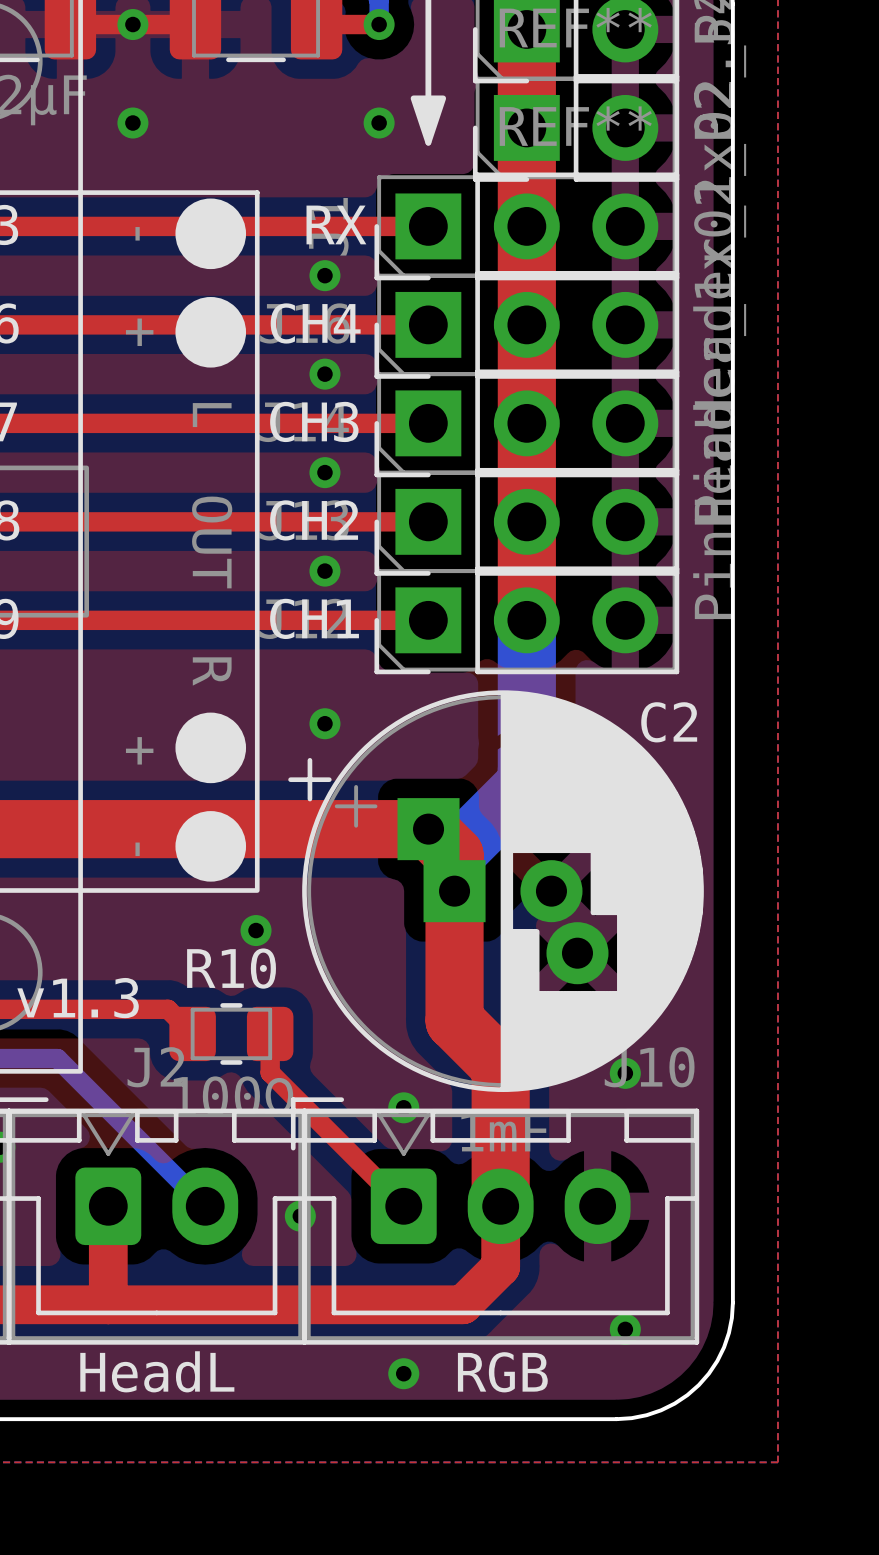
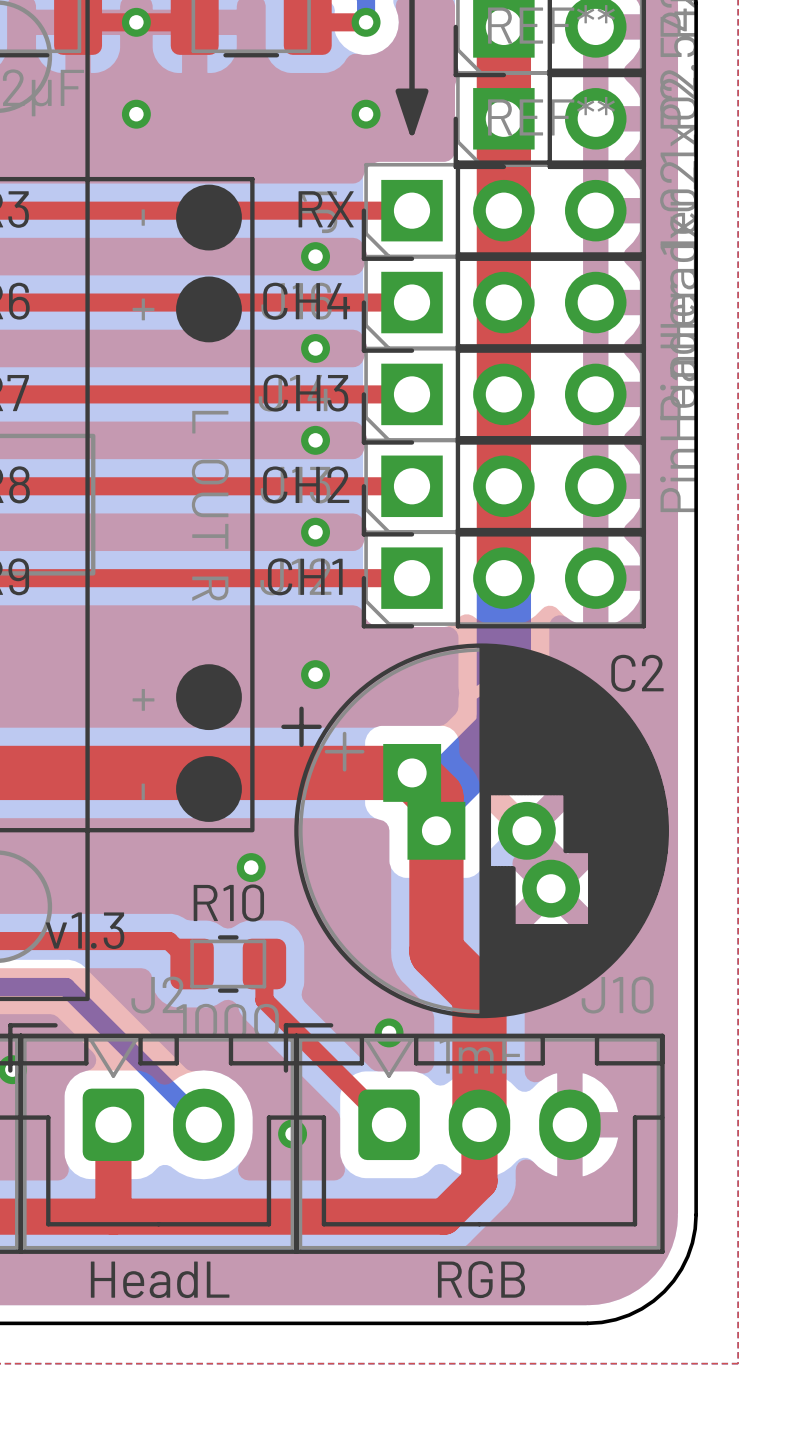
via: (625, 1073) -> none
via: (625, 1329) -> none
via: (403, 1373) -> none

